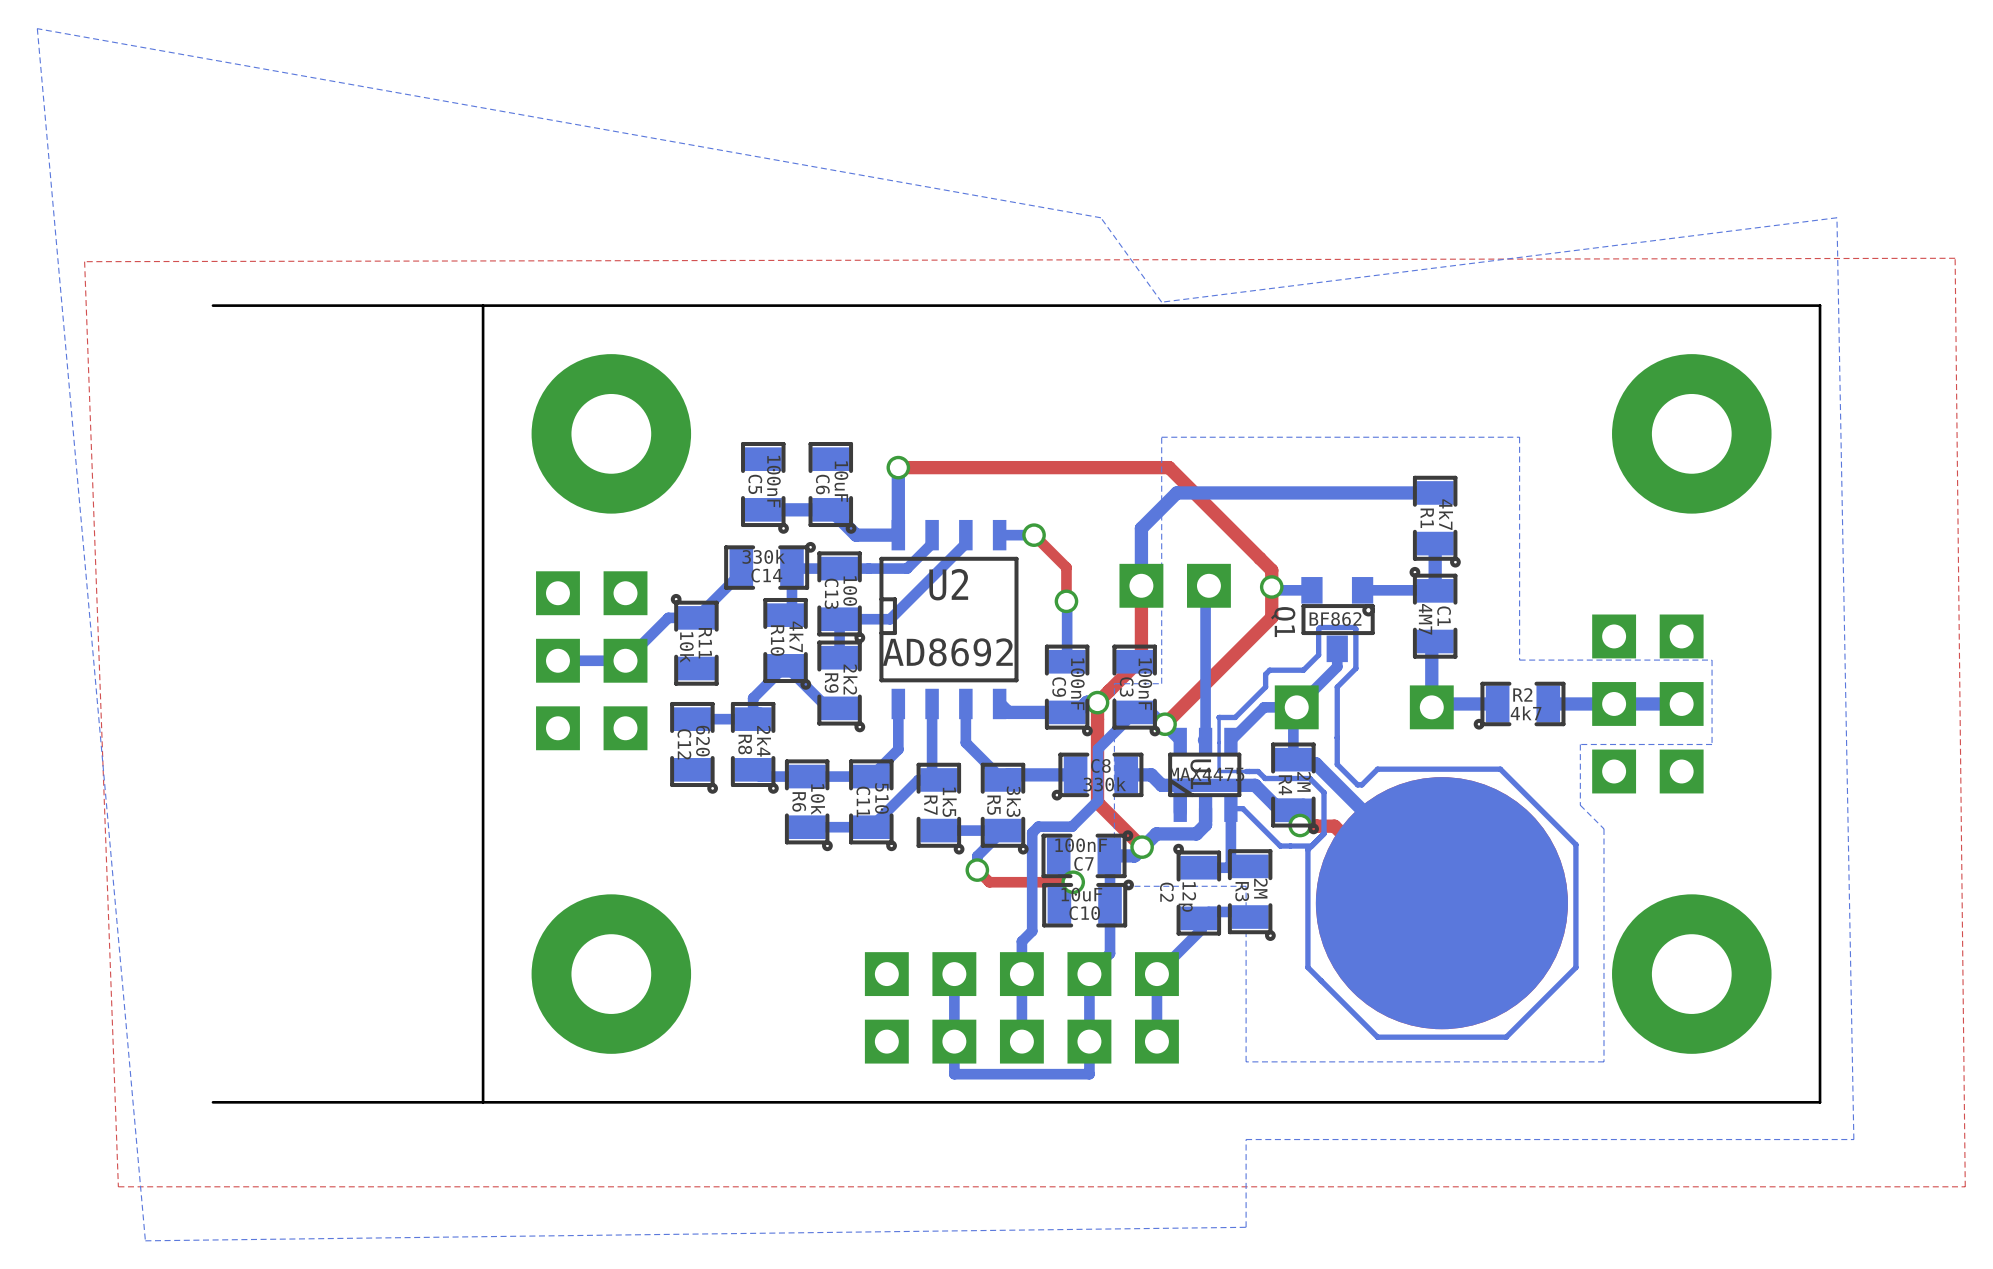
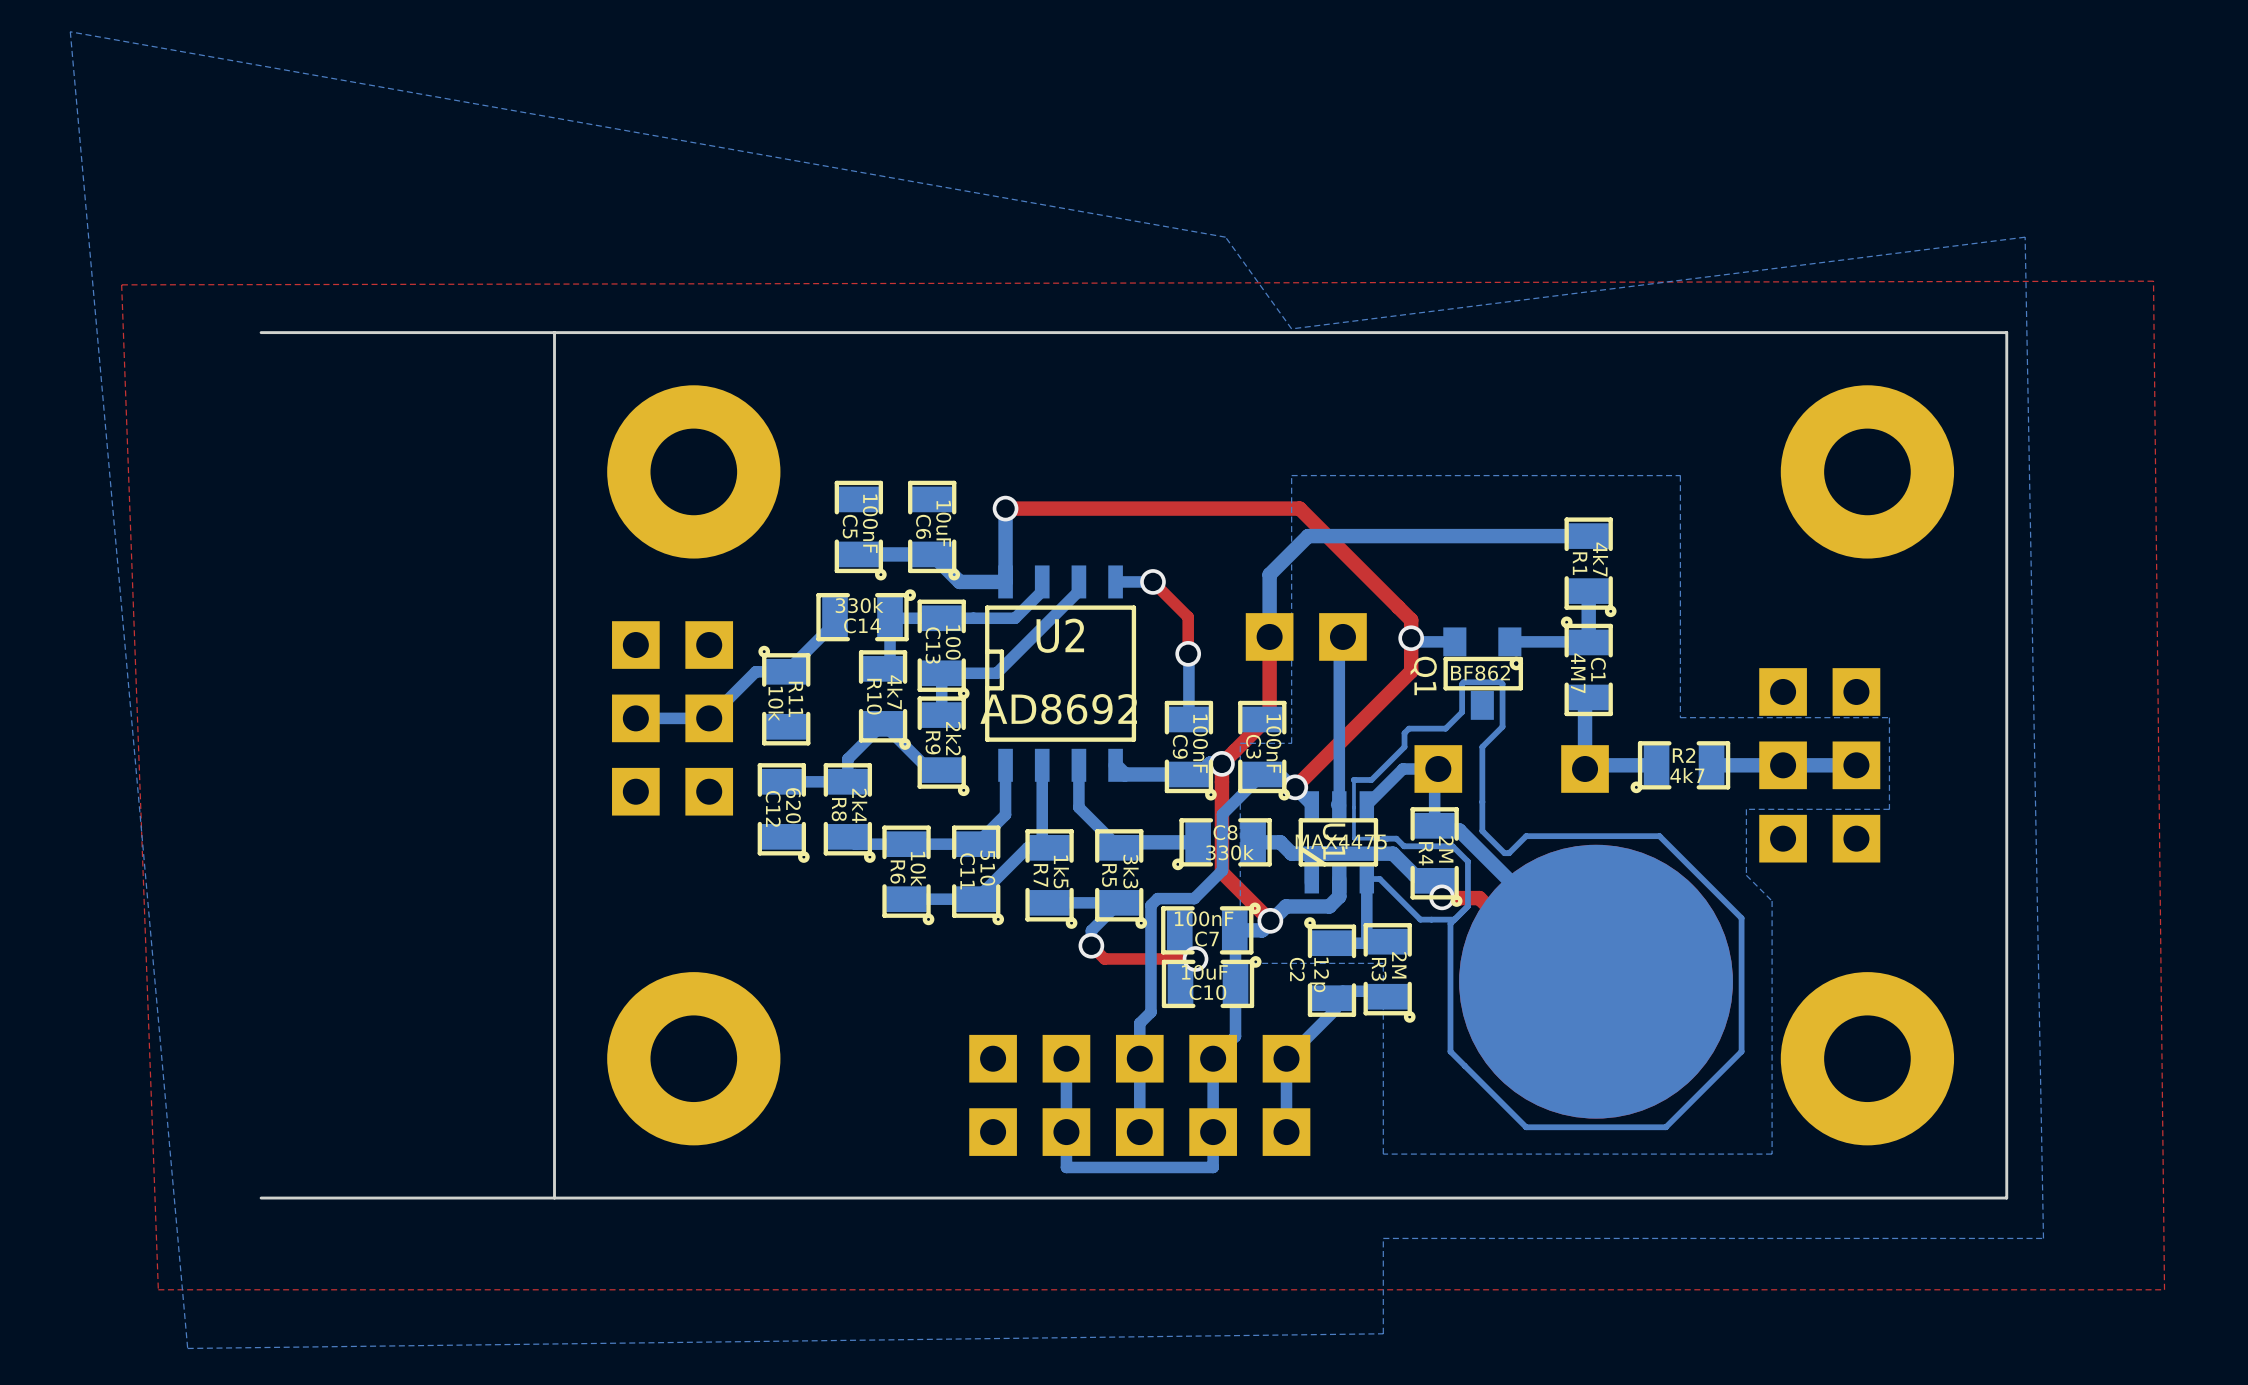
bottom track: (1337, 648) (1337, 666) (1296, 707) -> none

